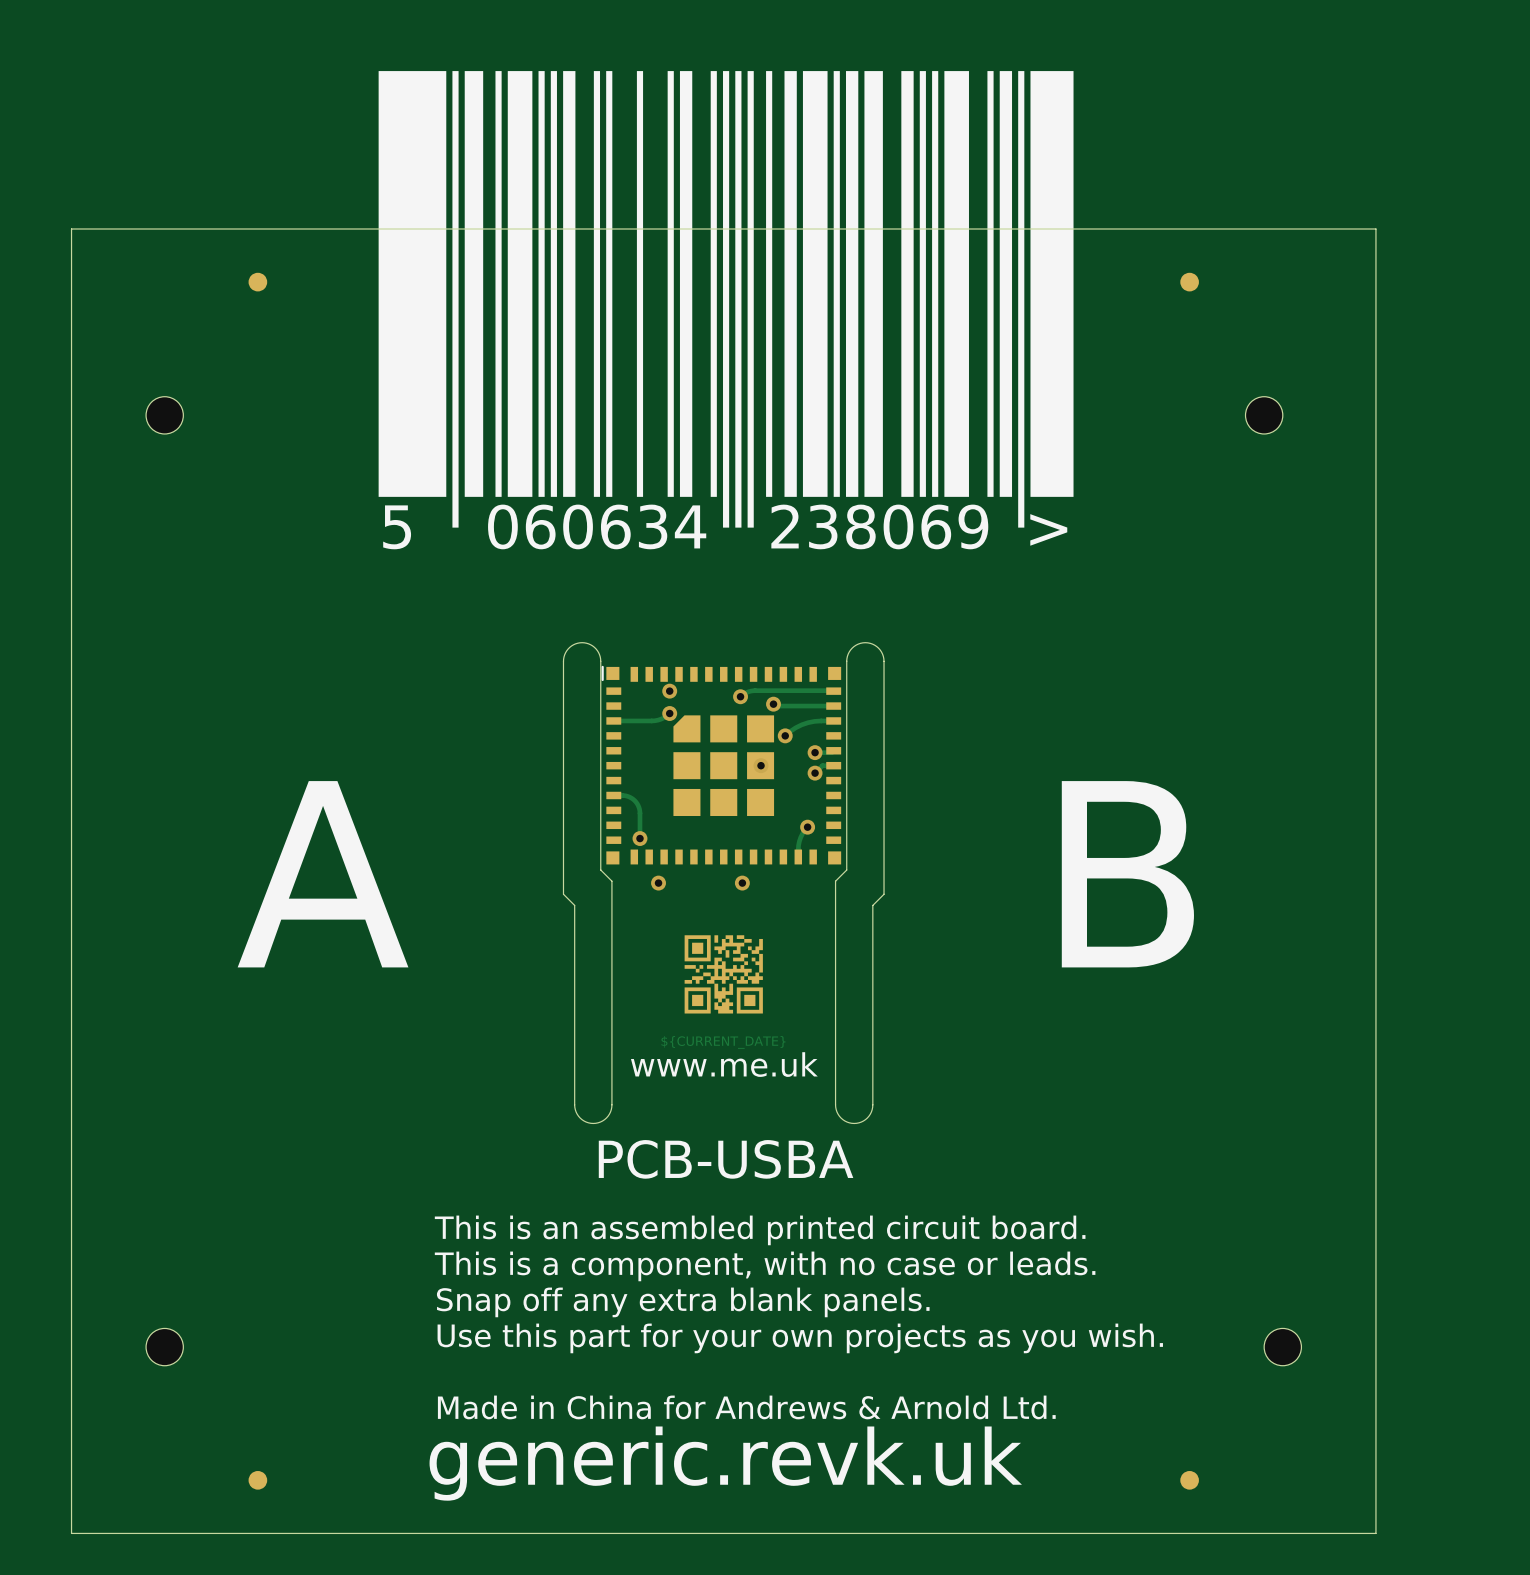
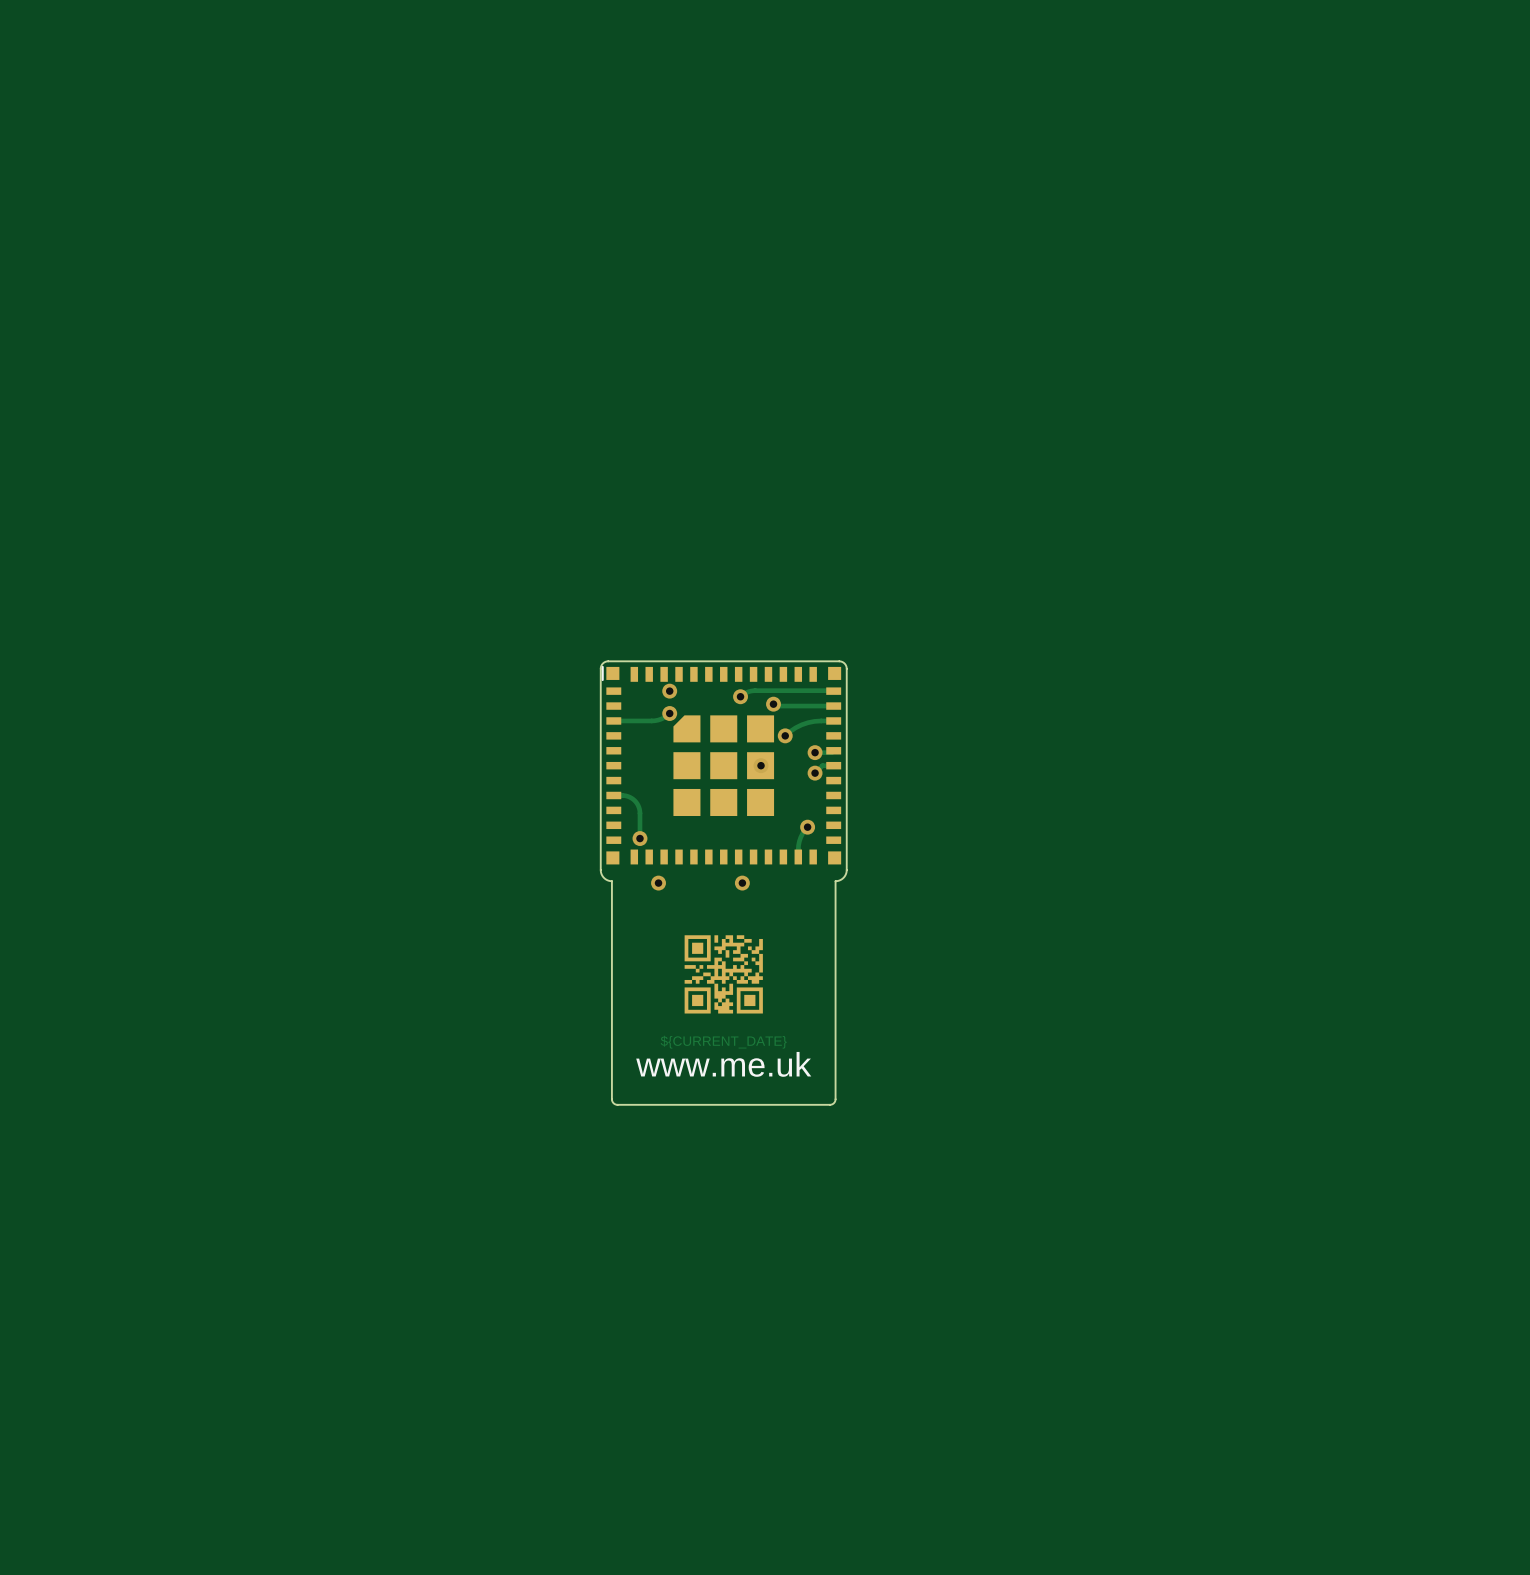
drawing: [378, 71, 1074, 528] -> none
board edge: (1375, 228) (1375, 1533) (71, 1533) (71, 228) (1375, 228) -> none
part: (257, 282) -> none
part: (1189, 282) -> none
part: (164, 415) -> none
part: (1264, 415) -> none
board edge: (600, 668) (598, 652) (588, 643) (582, 642) (573, 644) (564, 654) (563, 894) (574, 905) (574, 1104) (580, 1118) (593, 1123) (606, 1118) (611, 1104) (611, 881) (600, 870) -> (611, 881) (604, 877) (600, 870)
board edge: (846, 668) (848, 654) (858, 644) (872, 644) (882, 654) (884, 894) (872, 905) (872, 1104) (867, 1118) (854, 1123) (841, 1118) (835, 1104) (835, 881) (846, 870) -> (835, 881) (843, 877) (846, 870)
board edge: none -> (846, 668) (844, 663) (839, 661) (608, 661) (602, 663) (600, 668)
text: A (323, 874) -> none
text: B (1127, 874) -> none
part: none -> (723, 993)
text: PCB-USBA (726, 1159) -> none
text: This is an assembled printed circuit board. (760, 1230) -> none
text: This is a component, with no case or leads. (765, 1266) -> none
text: Snap off any extra blank panels. (683, 1302) -> none
text: Use this part for your own projects as you wish. (800, 1338) -> none
part: (164, 1347) -> none
part: (1282, 1347) -> none
text: Made in China for Andrews & Arnold Ltd. (746, 1407) -> none
text: generic.revk.uk (725, 1463) -> none
part: (257, 1480) -> none
part: (1189, 1480) -> none

